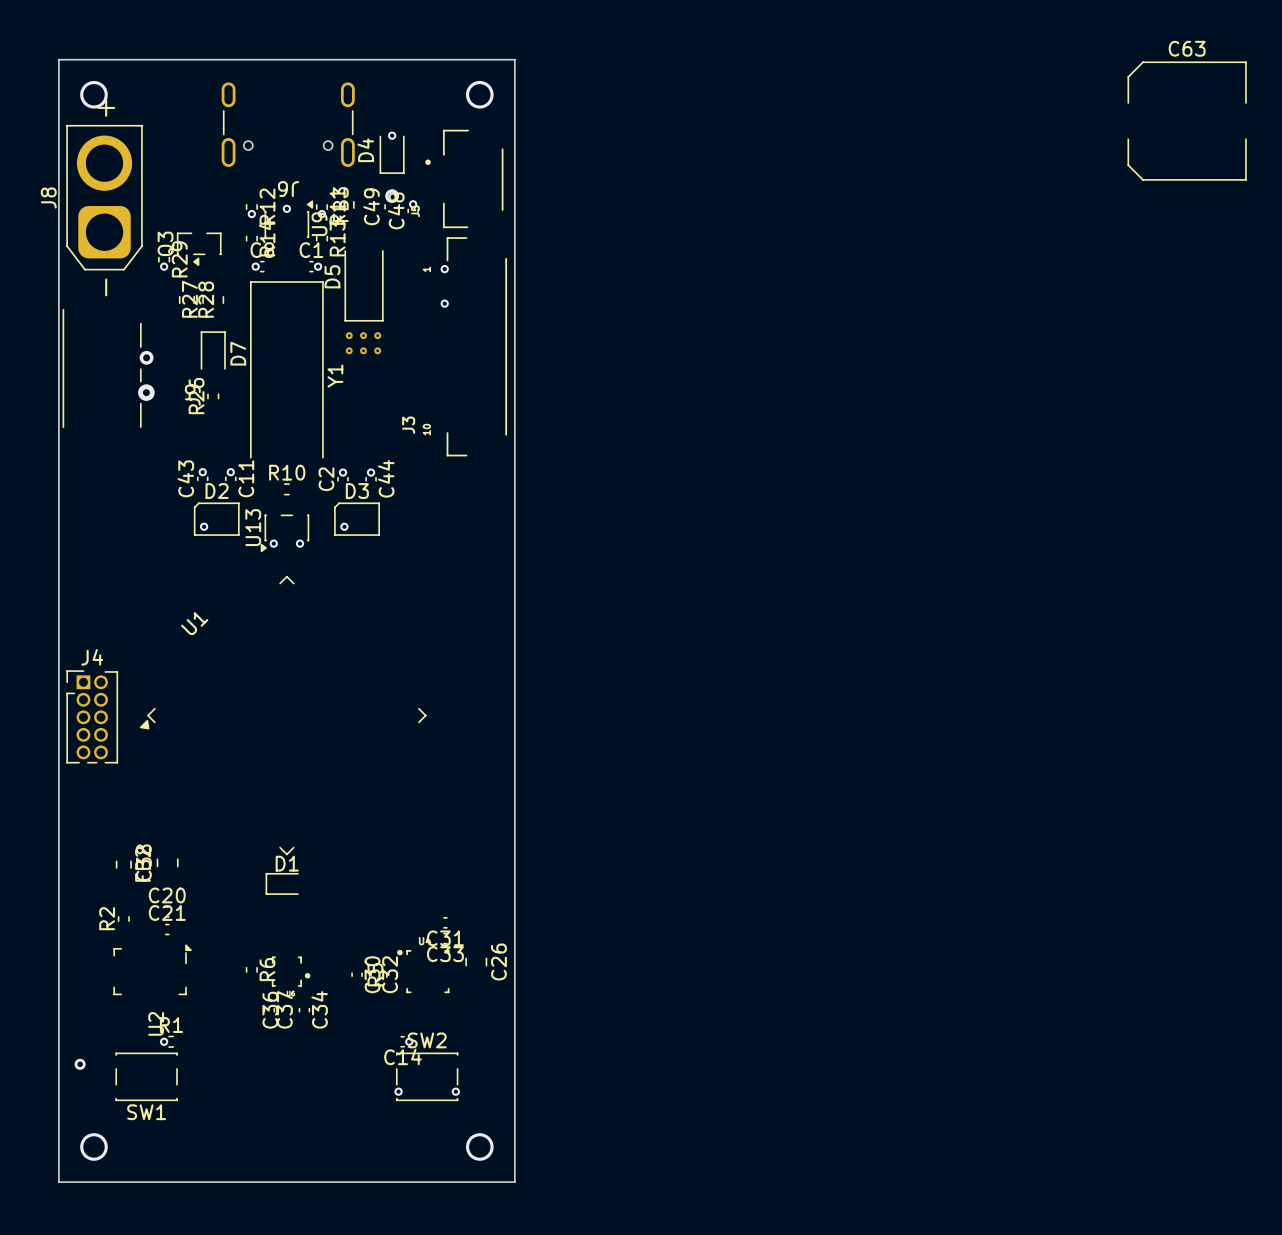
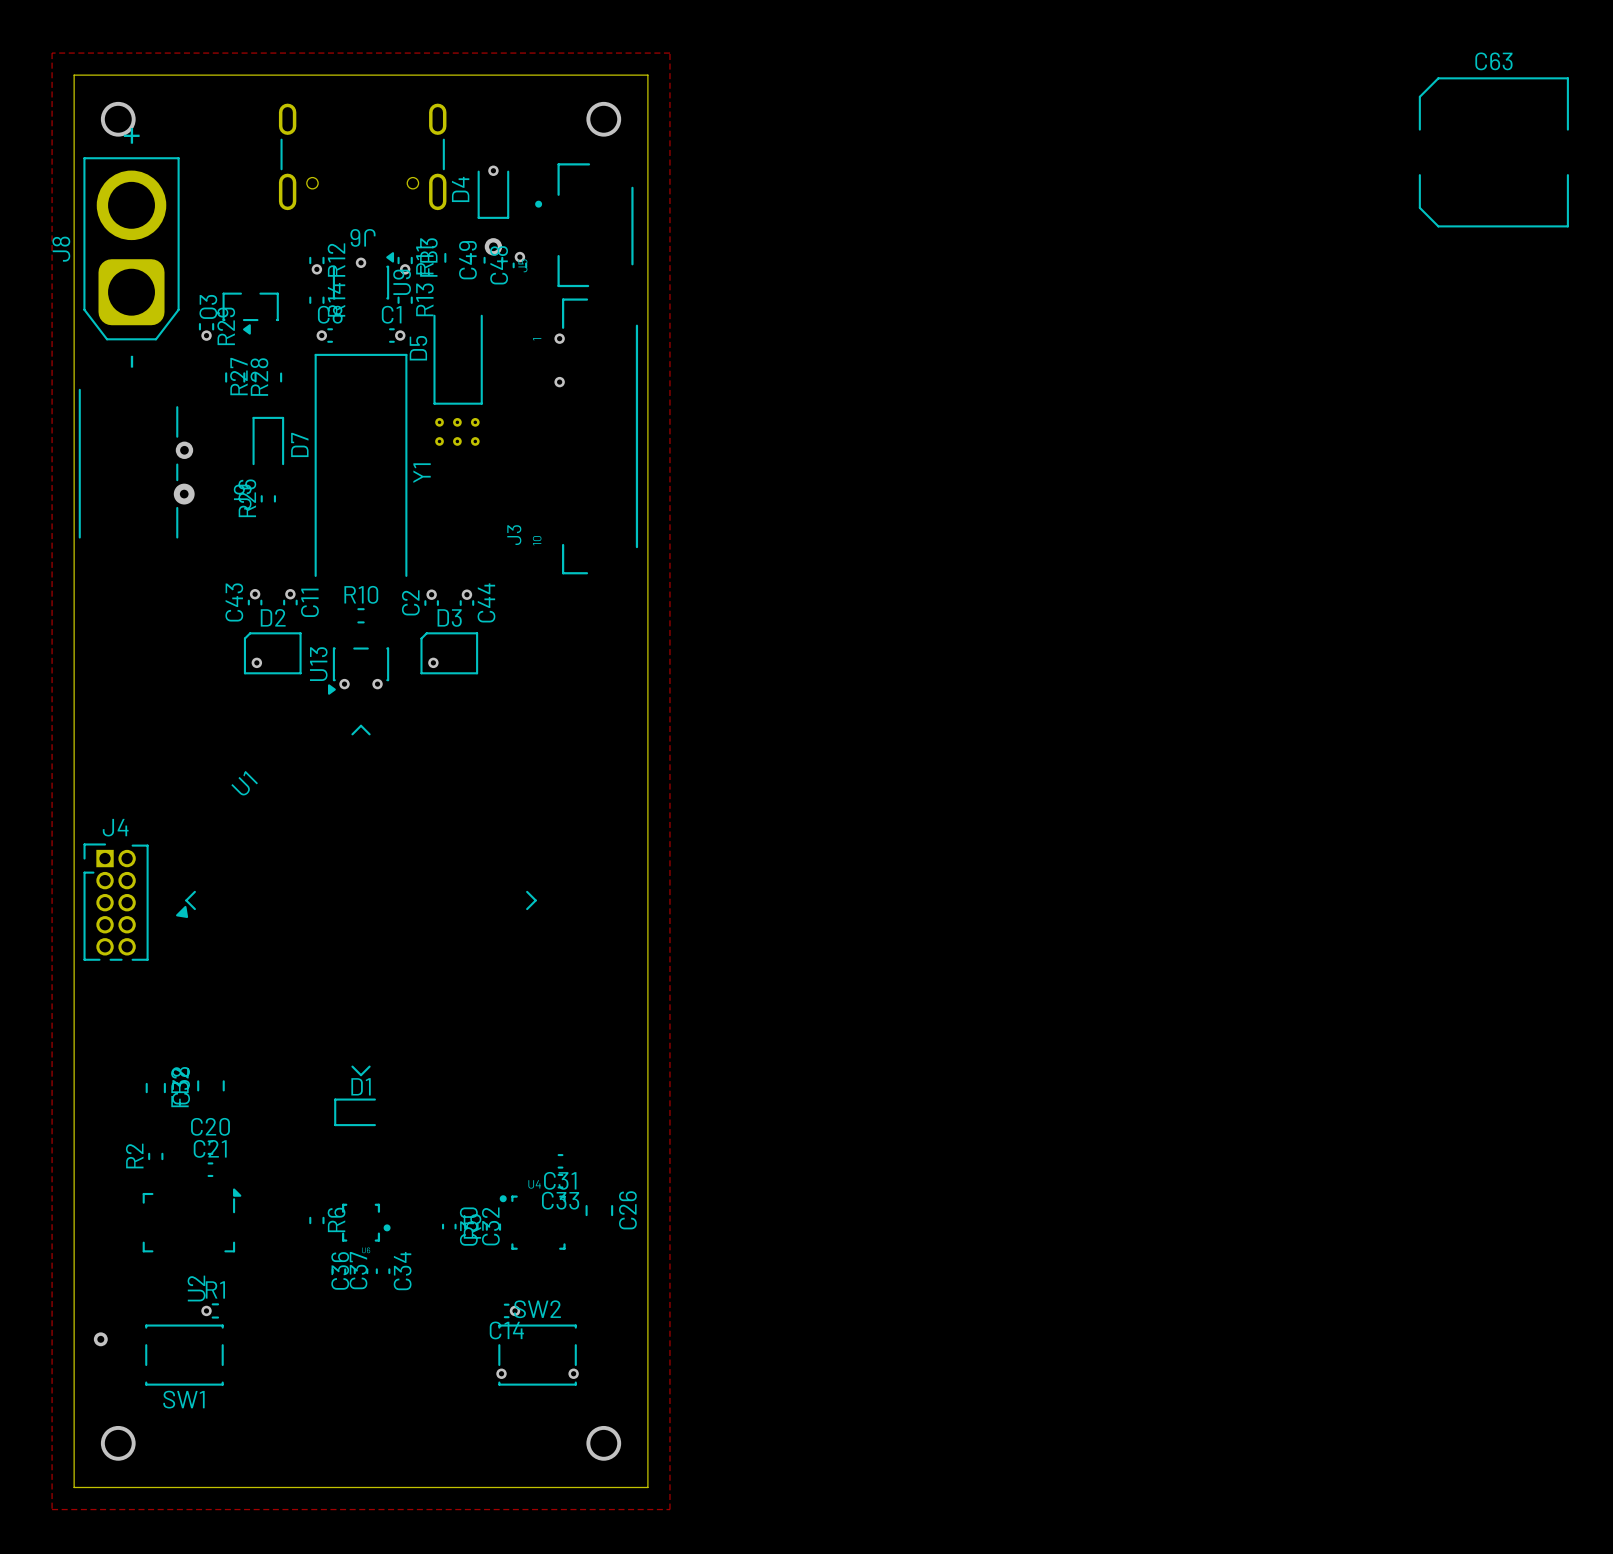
zone outline: none -> (52, 53) (52, 1509) (669, 1509) (669, 53) (52, 53)

